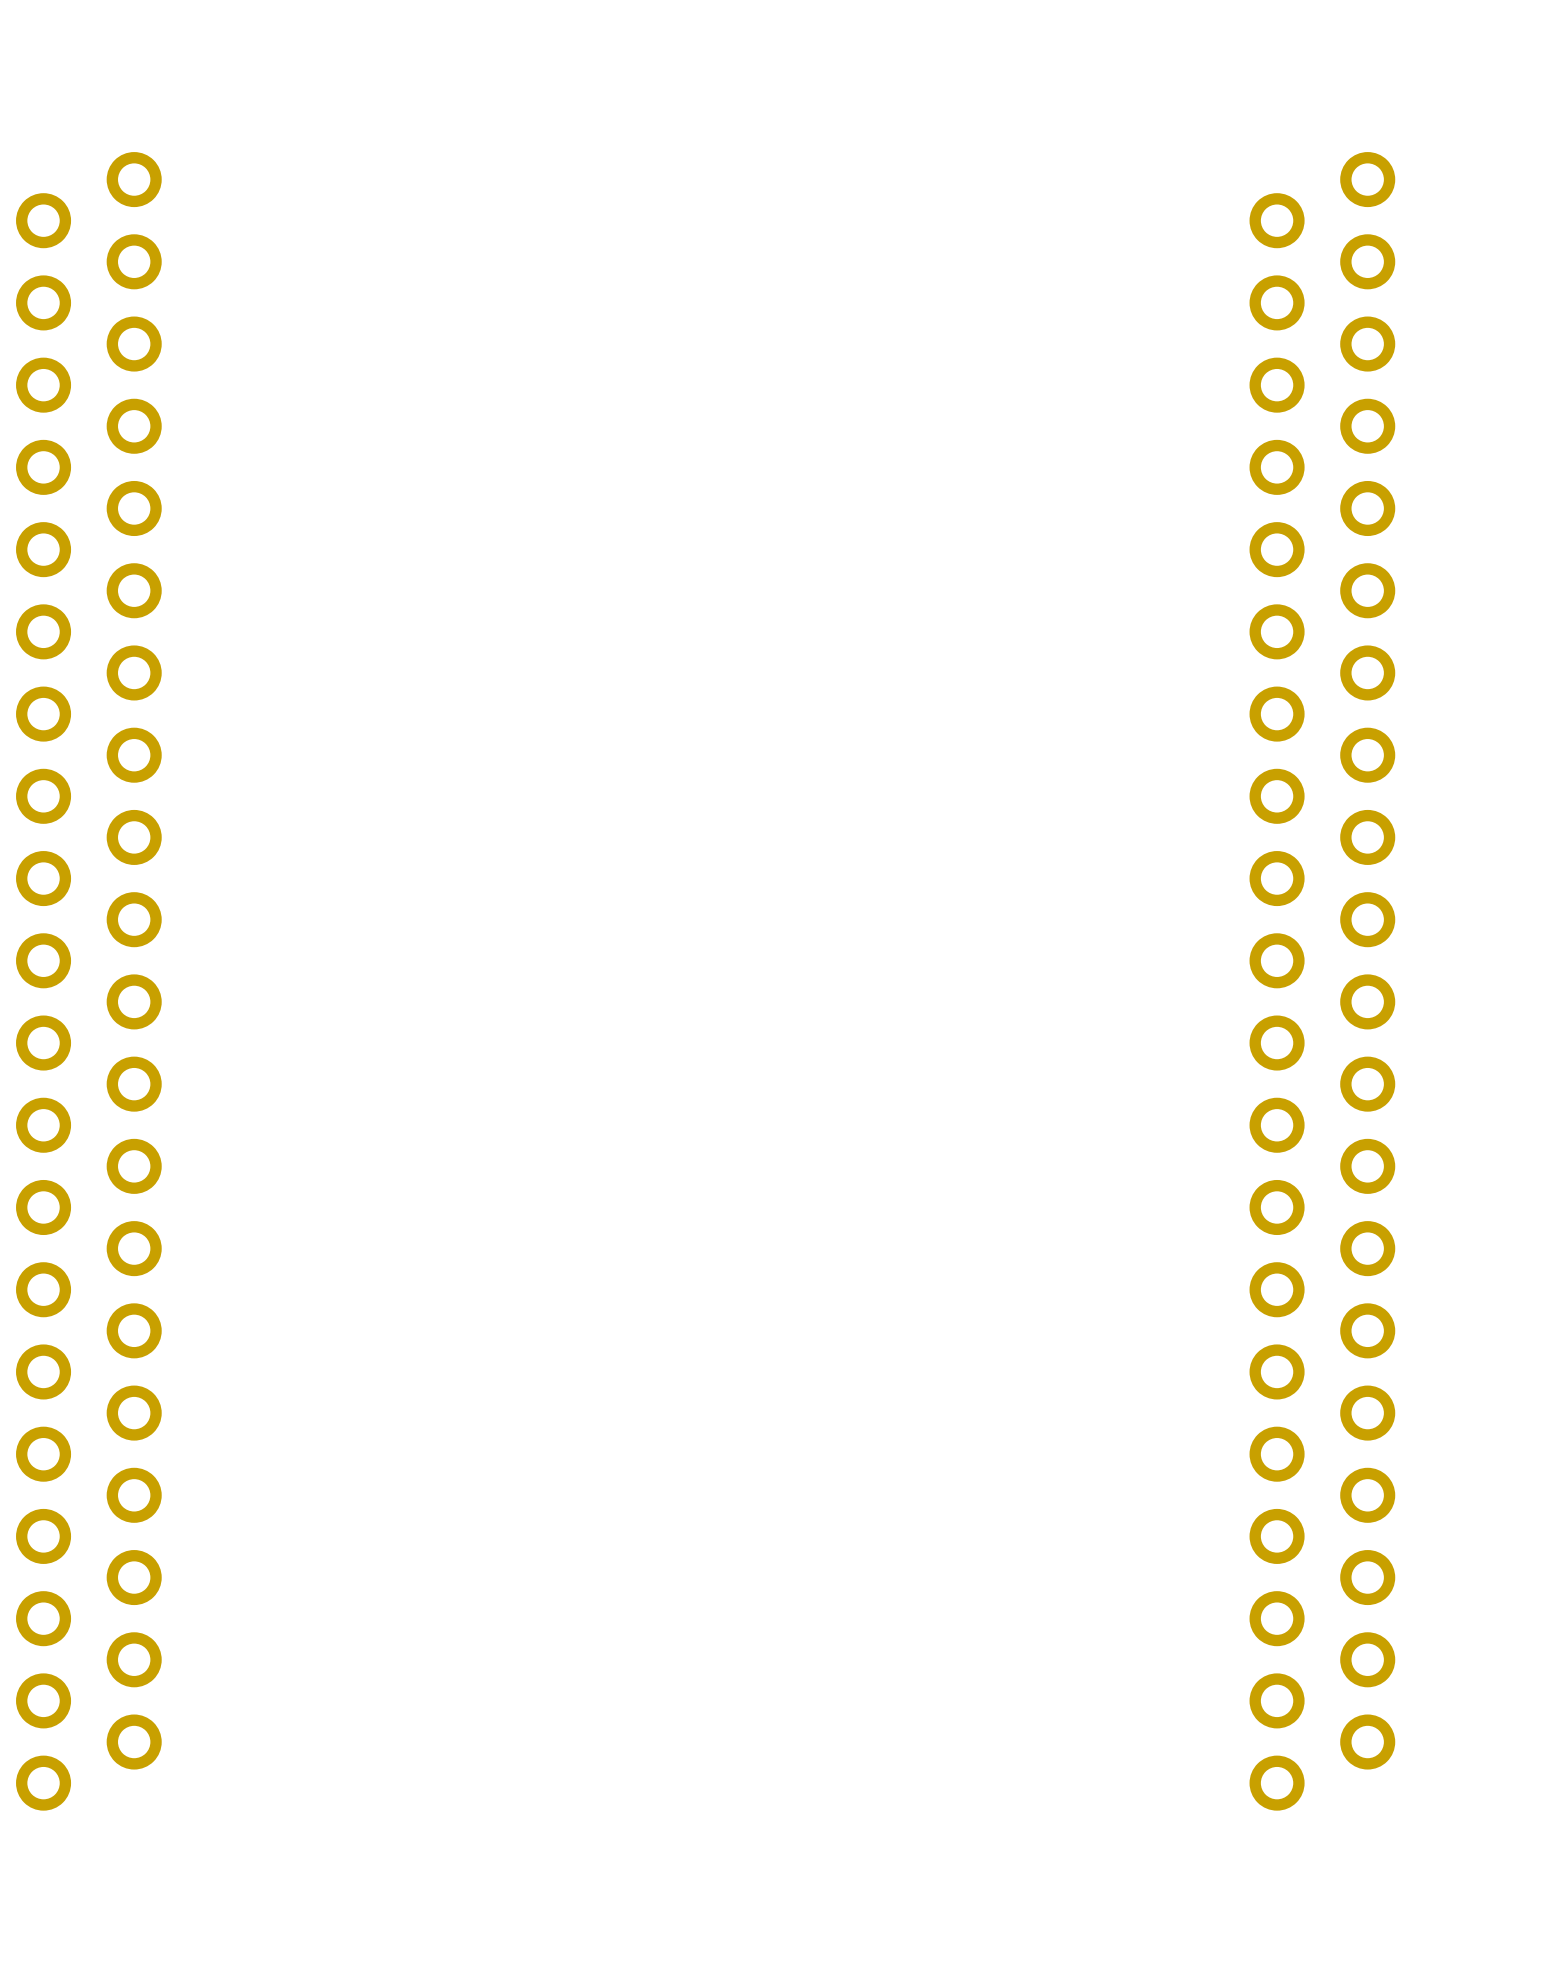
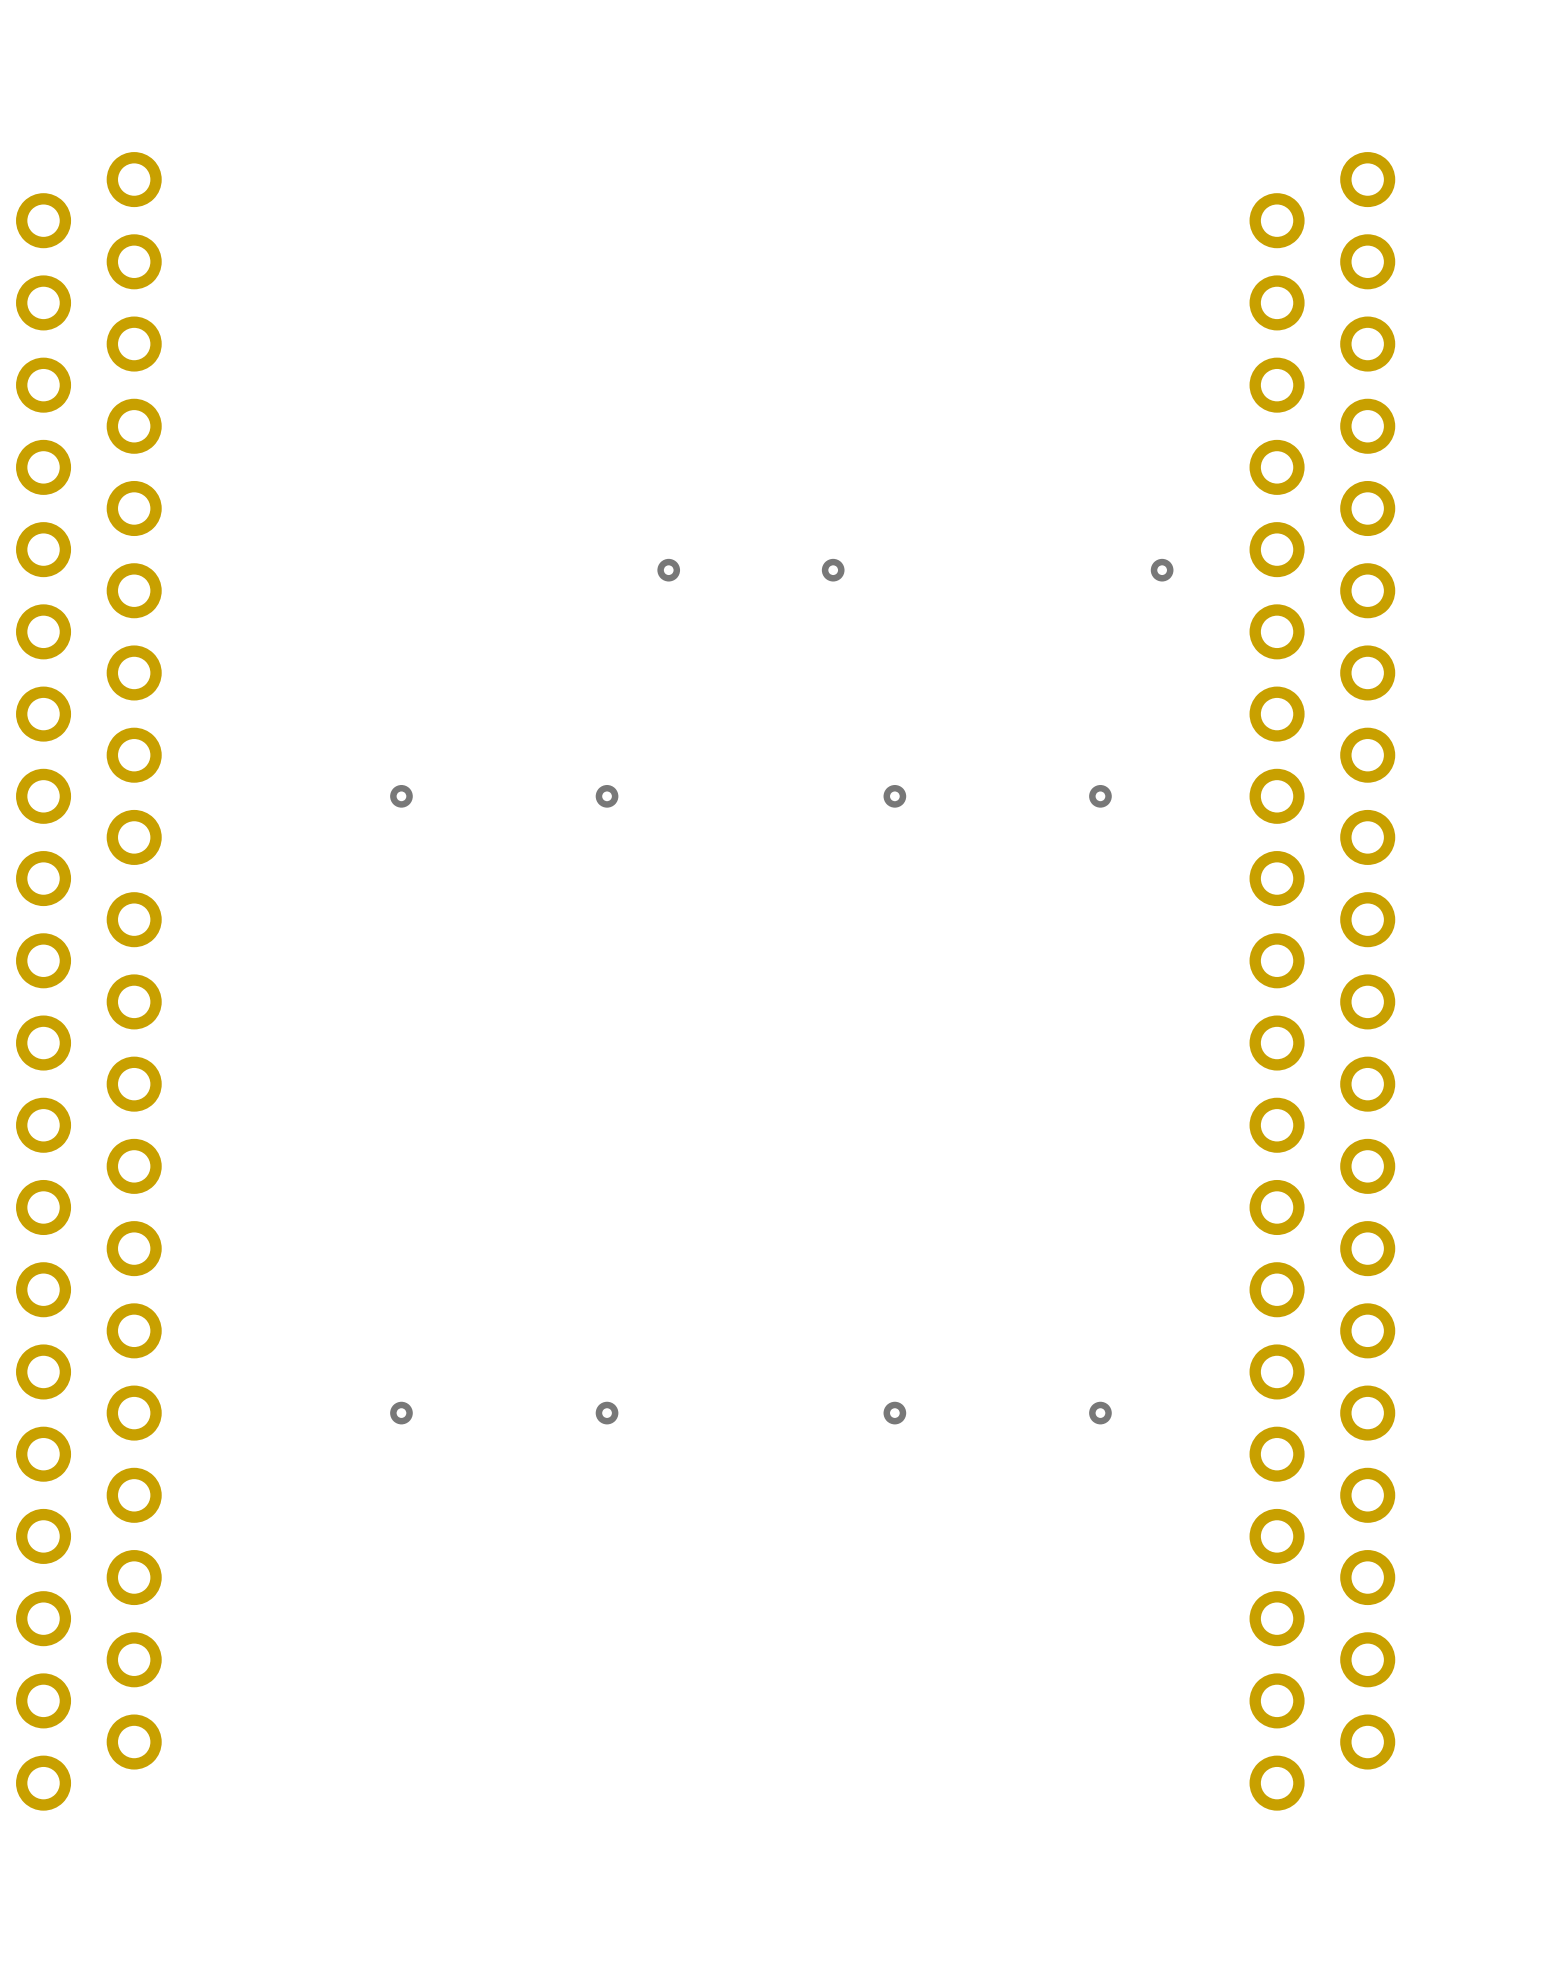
via: none -> (668, 570)
via: none -> (833, 570)
via: none -> (1162, 570)
via: none -> (401, 796)
via: none -> (607, 796)
via: none -> (894, 796)
via: none -> (1100, 796)
via: none -> (401, 1413)
via: none -> (607, 1413)
via: none -> (894, 1413)
via: none -> (1100, 1413)

